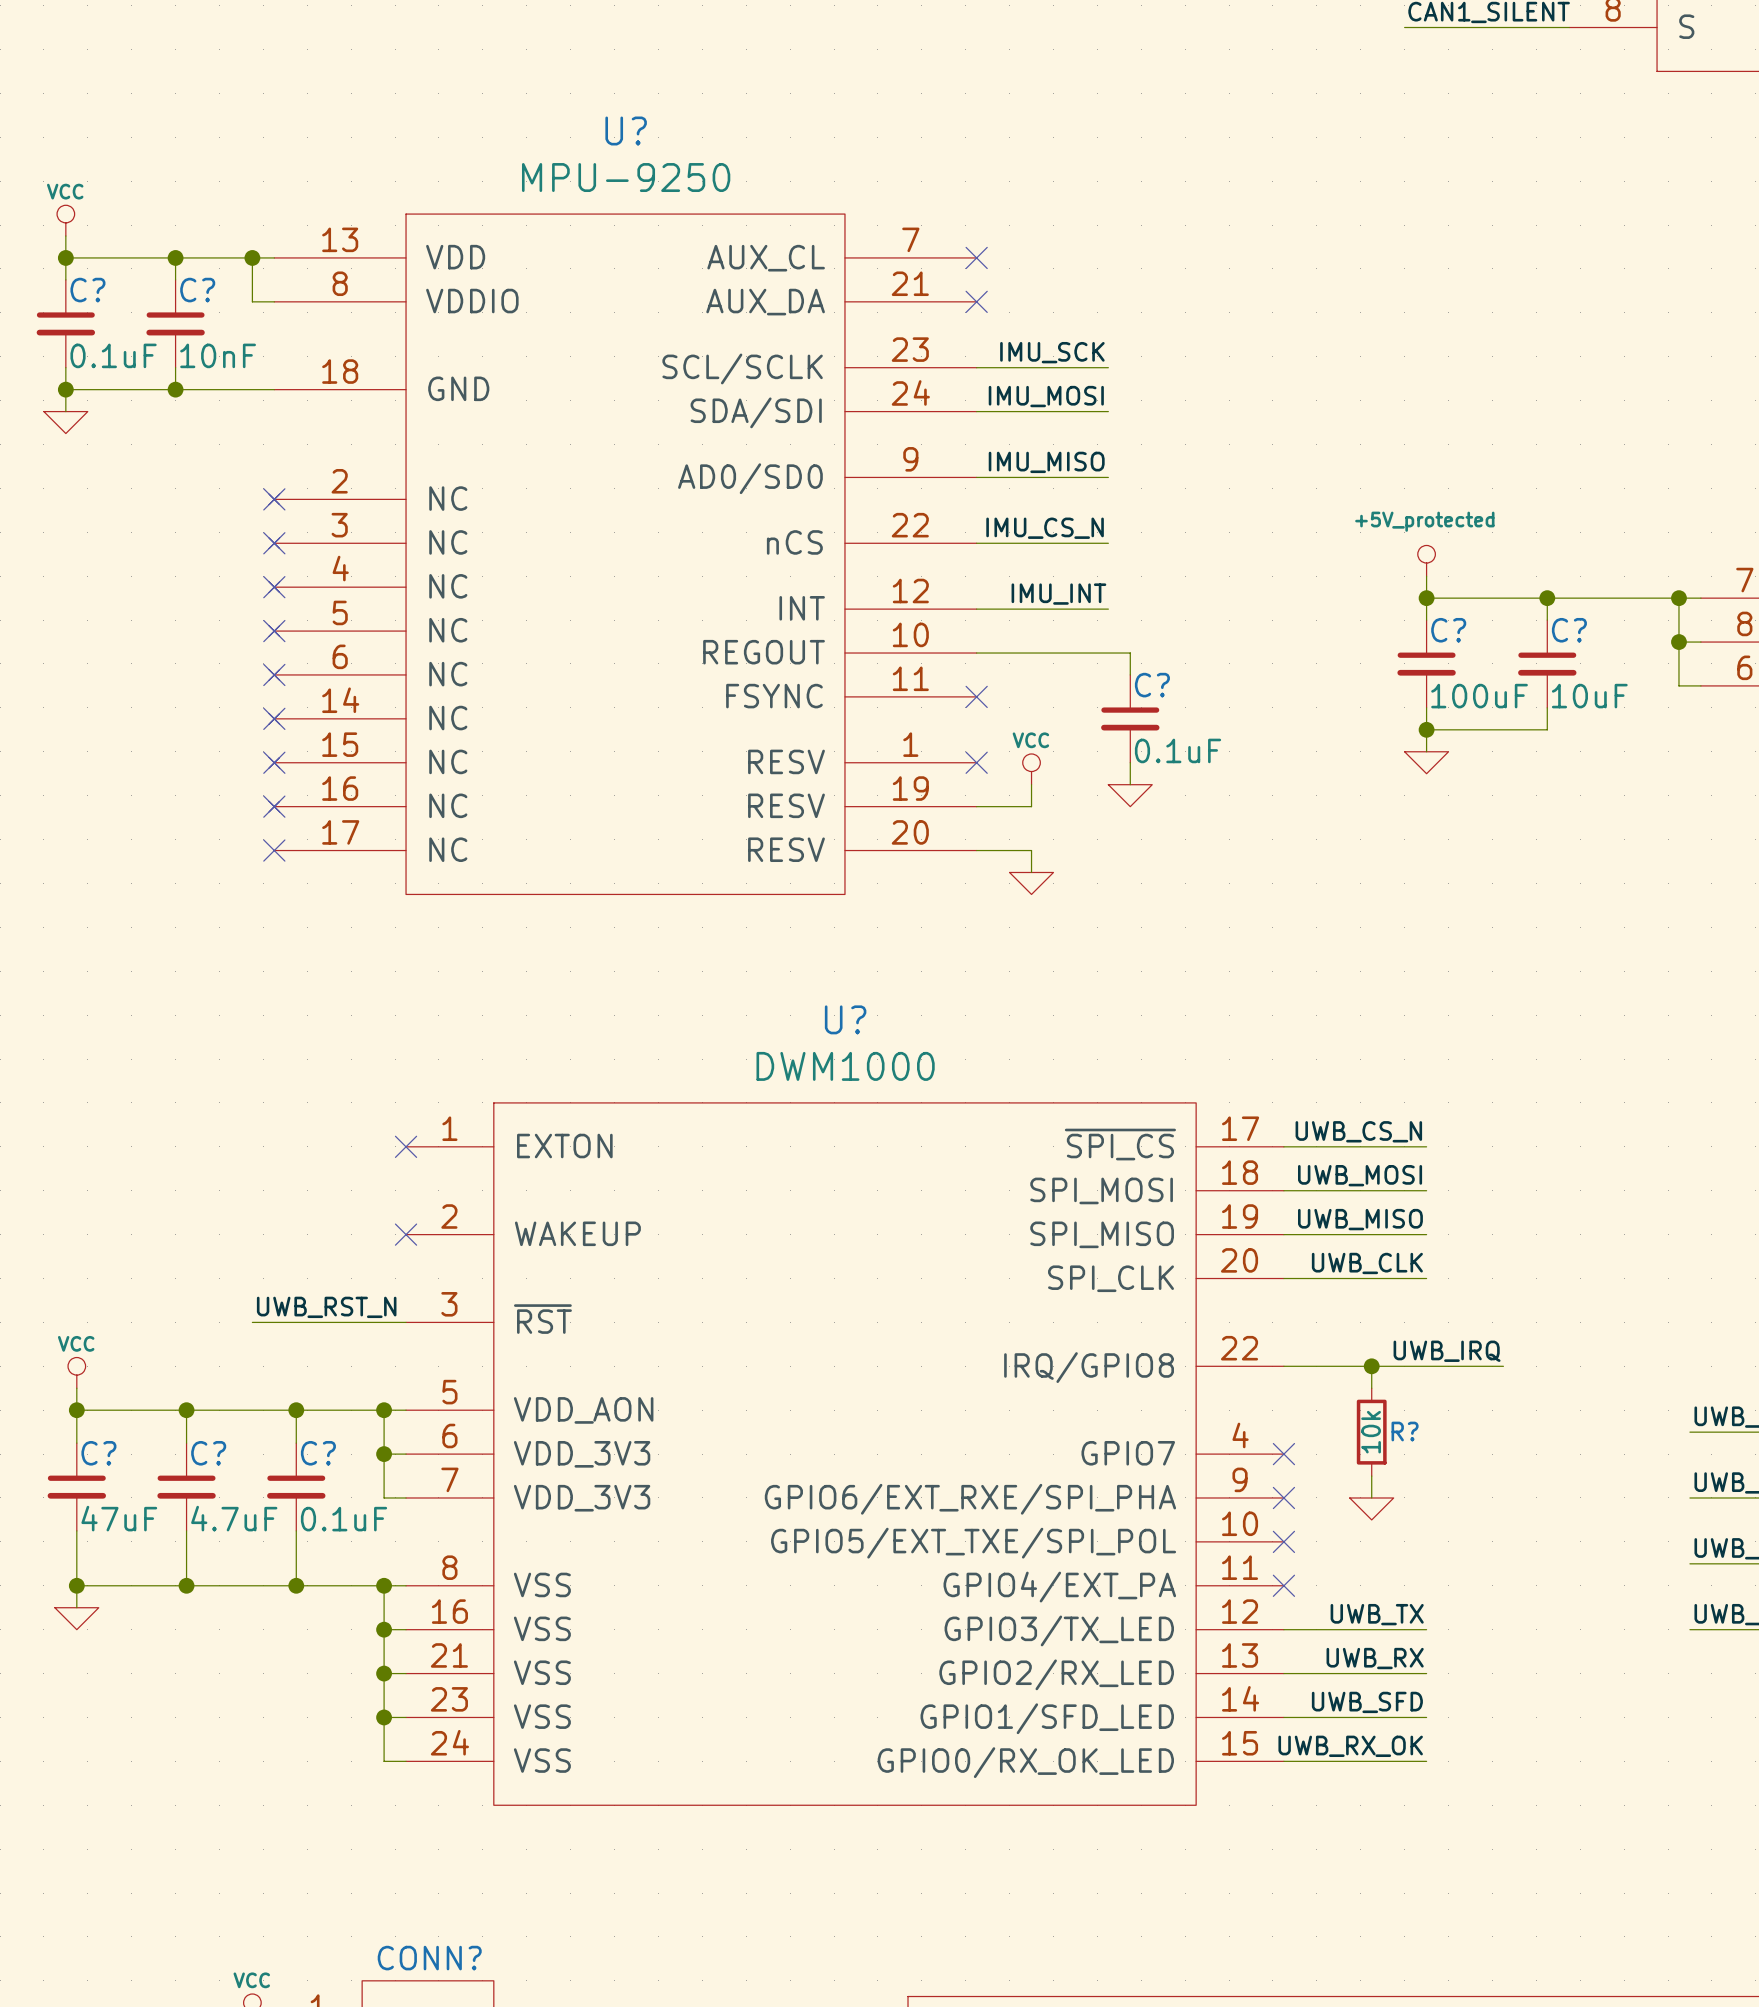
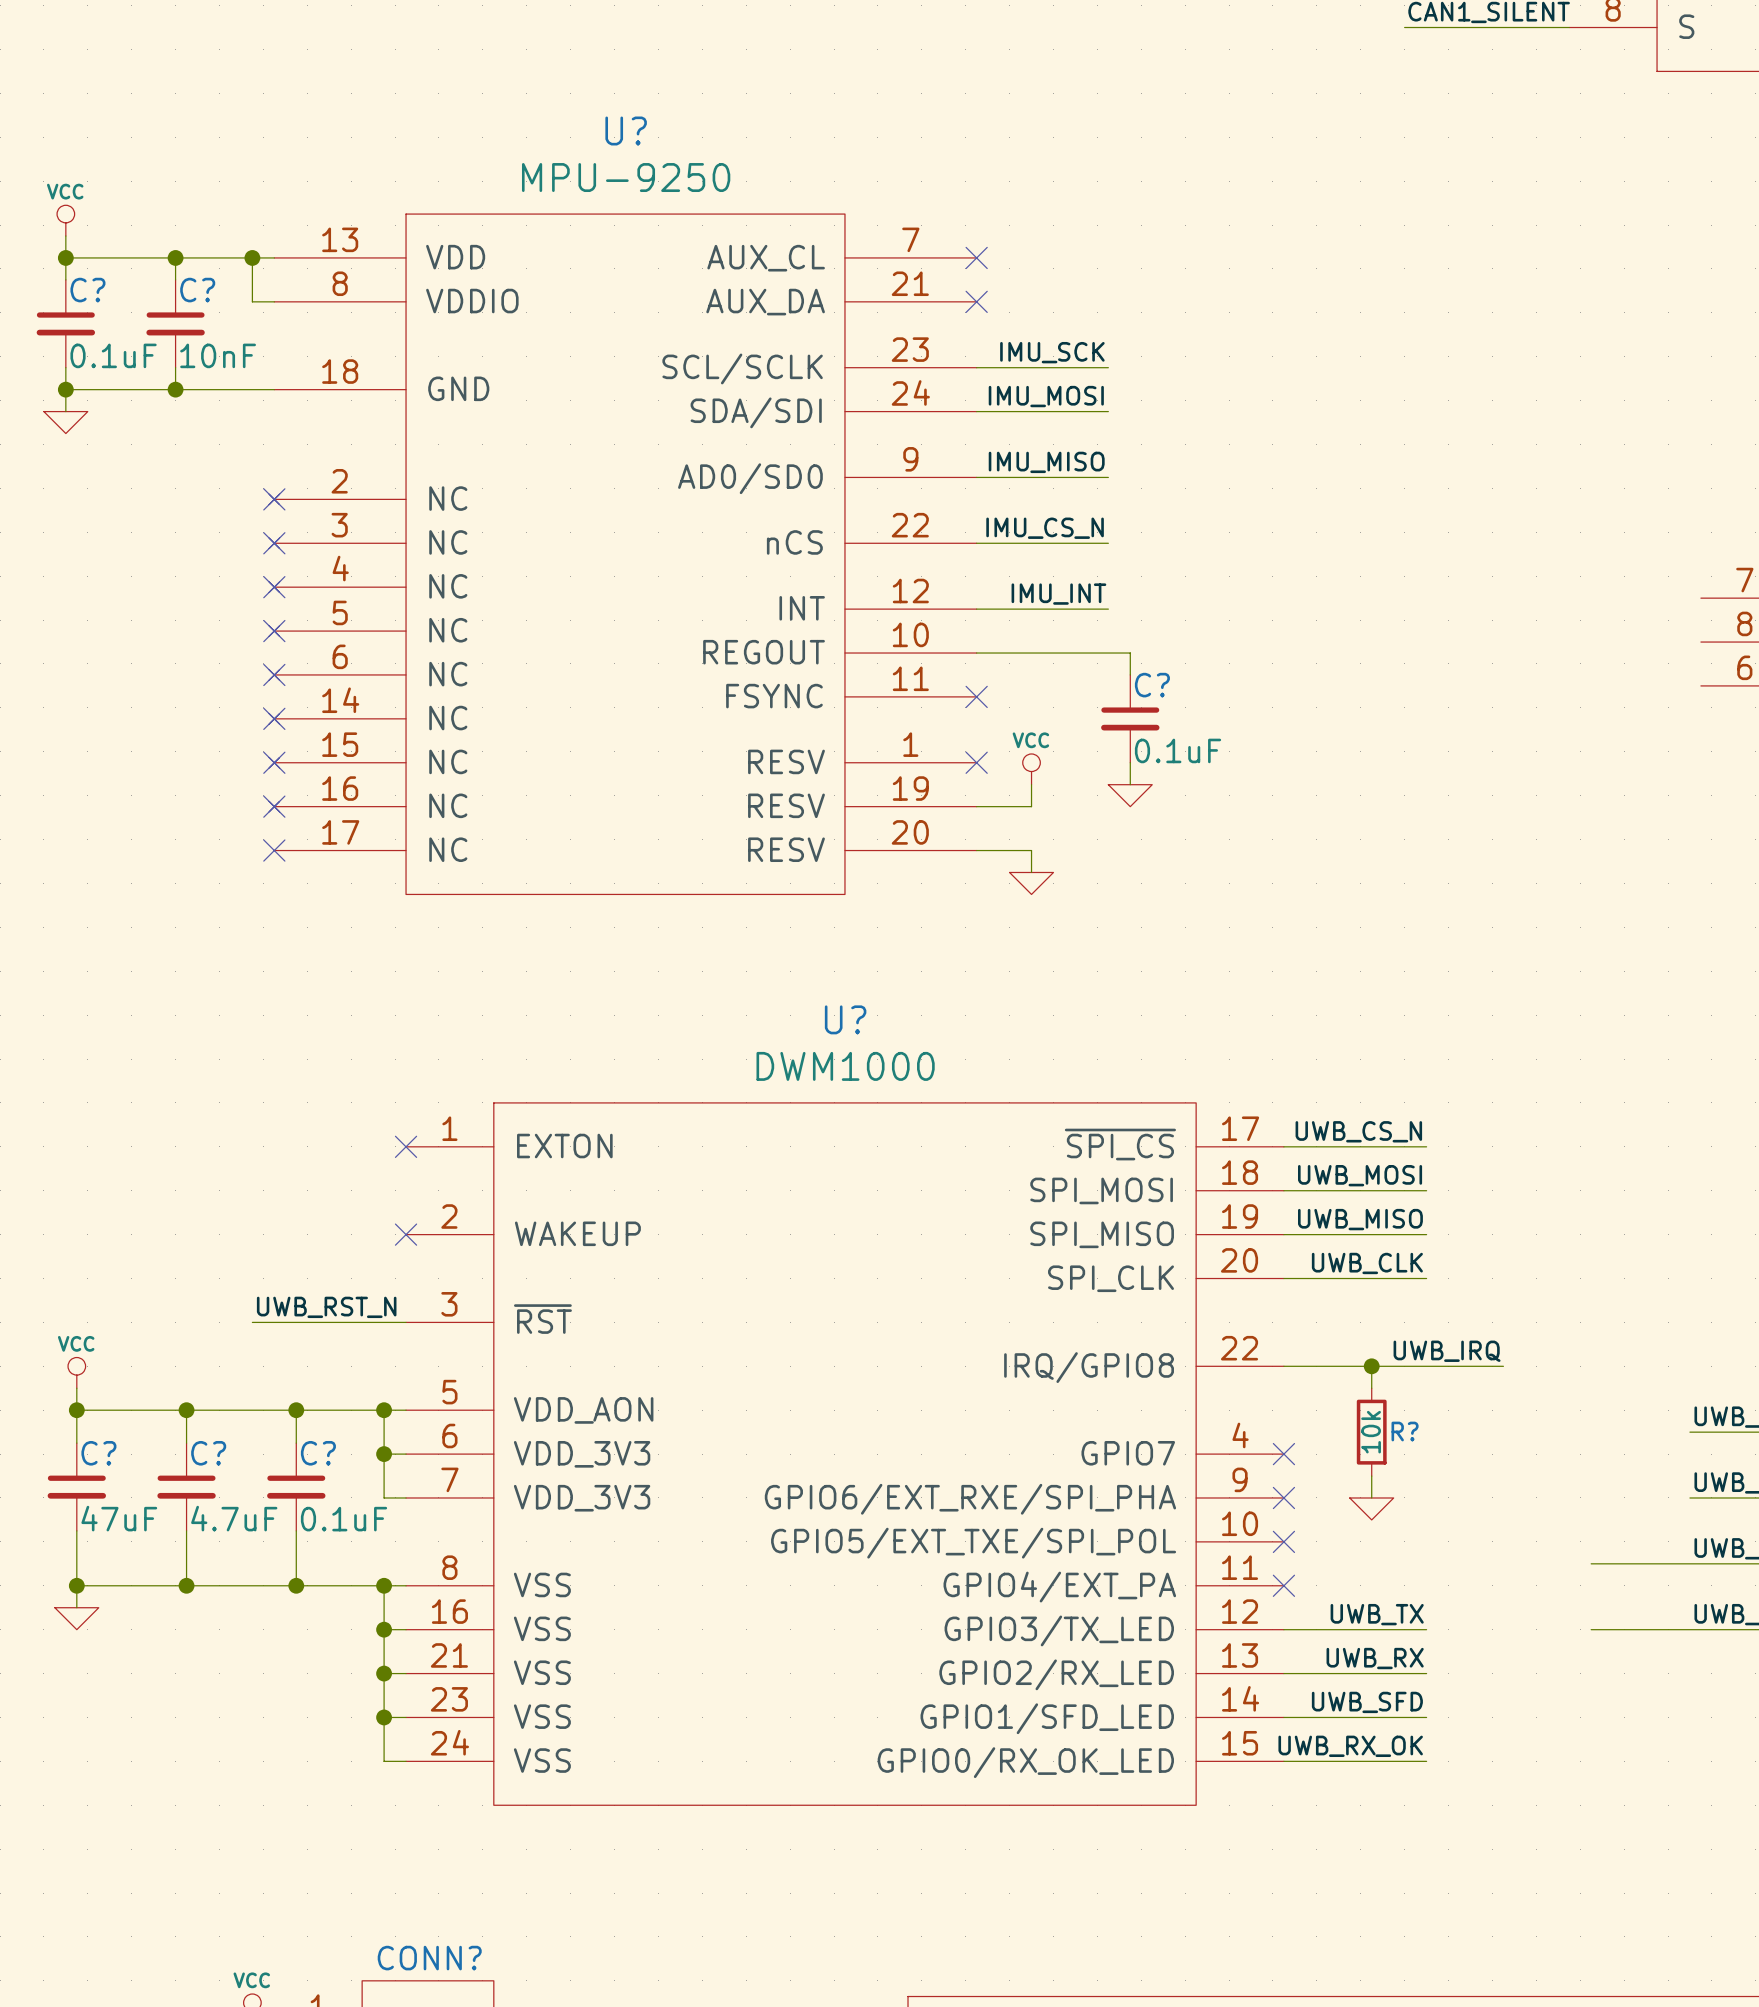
power symbol: +5V_protected (1426, 560) -> none
wire: (1426, 576) (1426, 620) -> none
wire: (1426, 598) (1700, 598) -> none
junction: (1426, 598) -> none
wire: (1547, 598) (1547, 620) -> none
junction: (1547, 598) -> none
wire: (1678, 598) (1678, 685) (1700, 685) -> none
junction: (1678, 598) -> none
wire: (1678, 642) (1700, 642) -> none
junction: (1678, 642) -> none
C?: 100uF (1426, 663) -> none
C?: 10uF (1547, 663) -> none
wire: (1426, 707) (1426, 751) -> none
wire: (1547, 707) (1547, 729) (1426, 729) -> none
junction: (1426, 729) -> none
power symbol: (1426, 762) -> none
wire: none -> (1591, 1563) (1689, 1563)
wire: none -> (1591, 1629) (1689, 1629)

